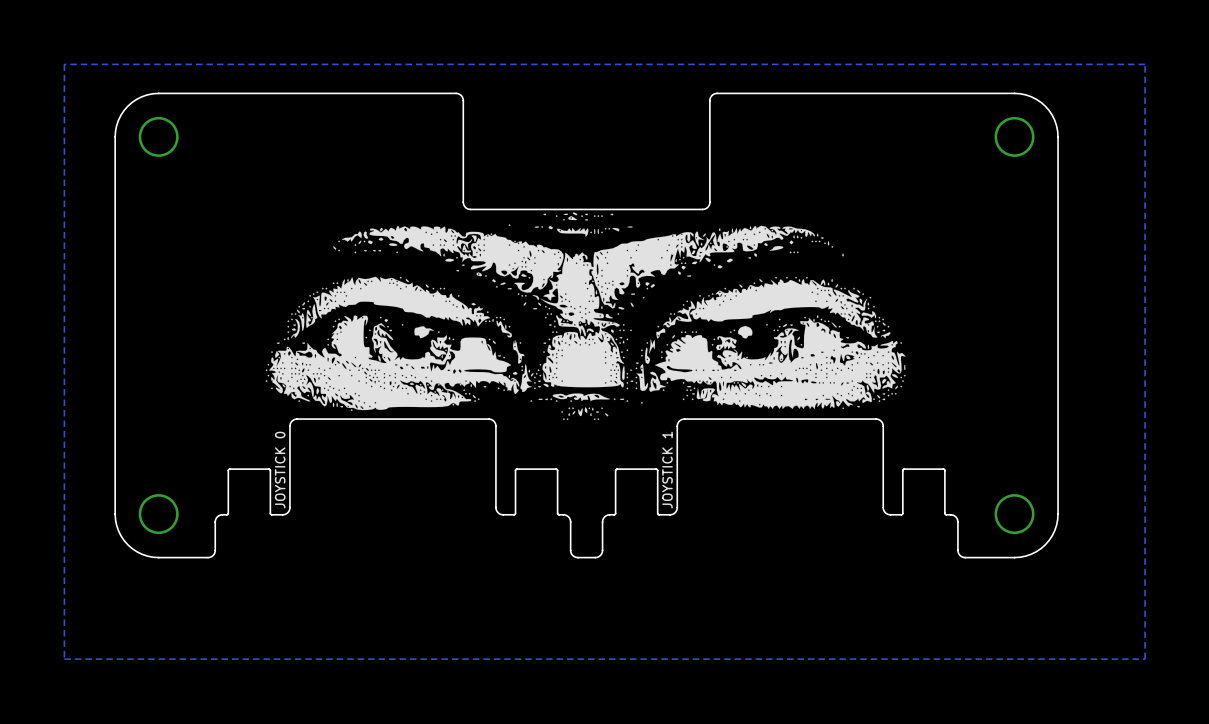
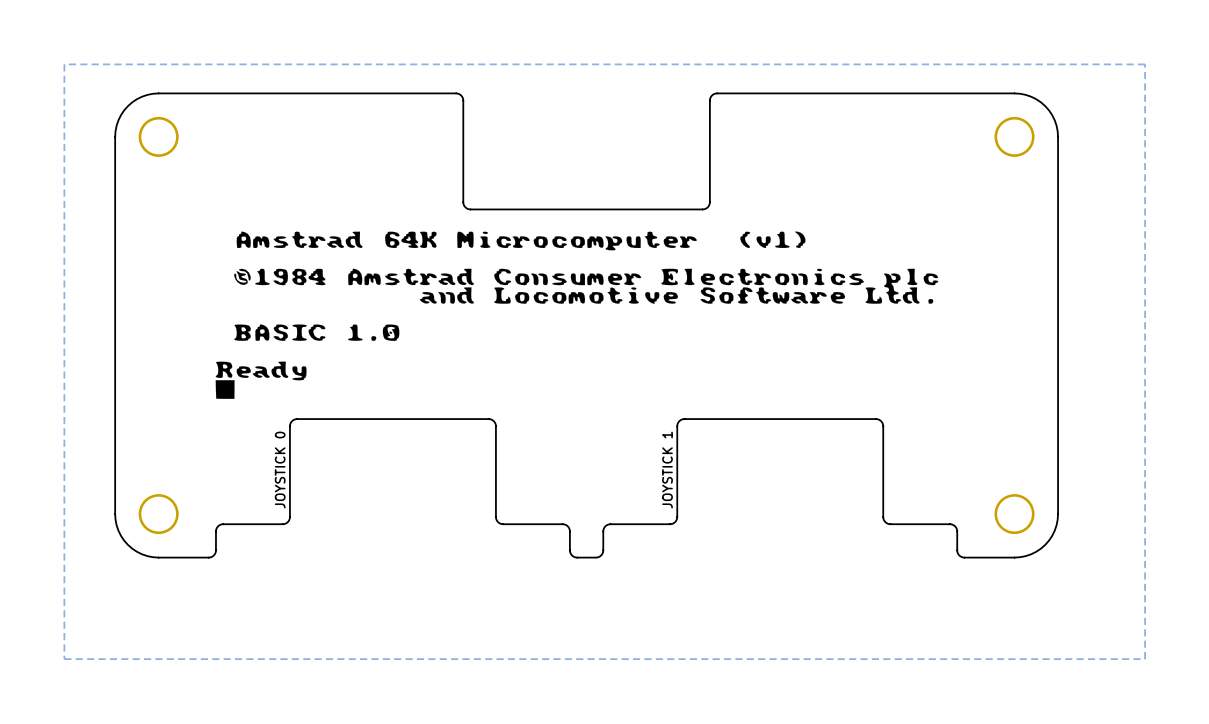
drawing shape: [265, 212, 906, 421] -> [215, 231, 939, 399]
board edge: (289, 507) (284, 514) (270, 514) (269, 469) (229, 469) (228, 513) (219, 515) (215, 519) (215, 552) (208, 557) -> (289, 507) (289, 518) (284, 523) (219, 525) (216, 530) (215, 553) (208, 557)
board edge: (495, 507) (501, 514) (515, 514) (516, 469) (556, 469) (557, 513) (566, 515) (570, 519) (570, 552) (577, 557) -> (495, 507) (496, 518) (501, 523) (566, 525) (569, 530) (570, 553) (577, 557)
board edge: (677, 507) (671, 514) (657, 514) (656, 469) (616, 469) (615, 513) (607, 515) (603, 519) (602, 552) (595, 557) -> (677, 507) (677, 518) (671, 523) (606, 525) (603, 530) (603, 552) (596, 557)
board edge: (883, 507) (888, 514) (902, 514) (903, 469) (944, 469) (944, 513) (953, 515) (957, 519) (958, 552) (965, 557) -> (883, 507) (883, 518) (888, 523) (953, 525) (957, 530) (957, 553) (965, 557)

